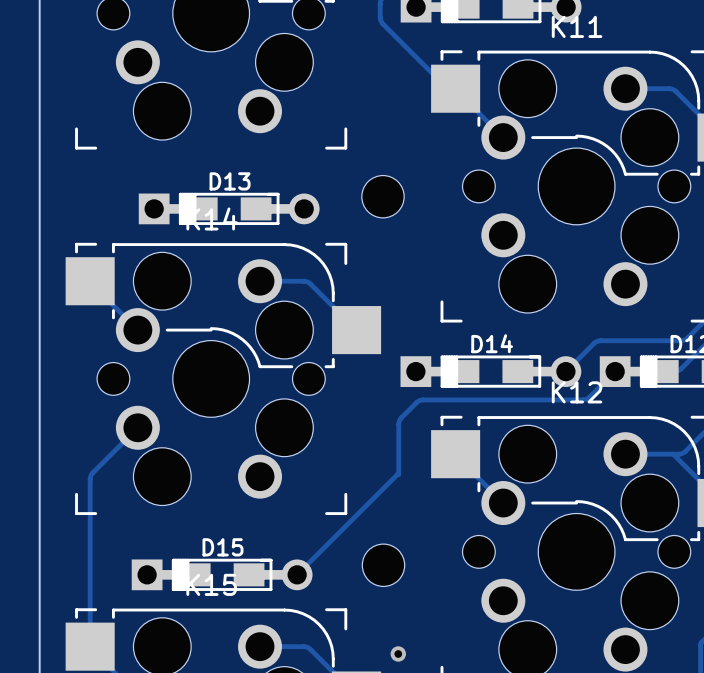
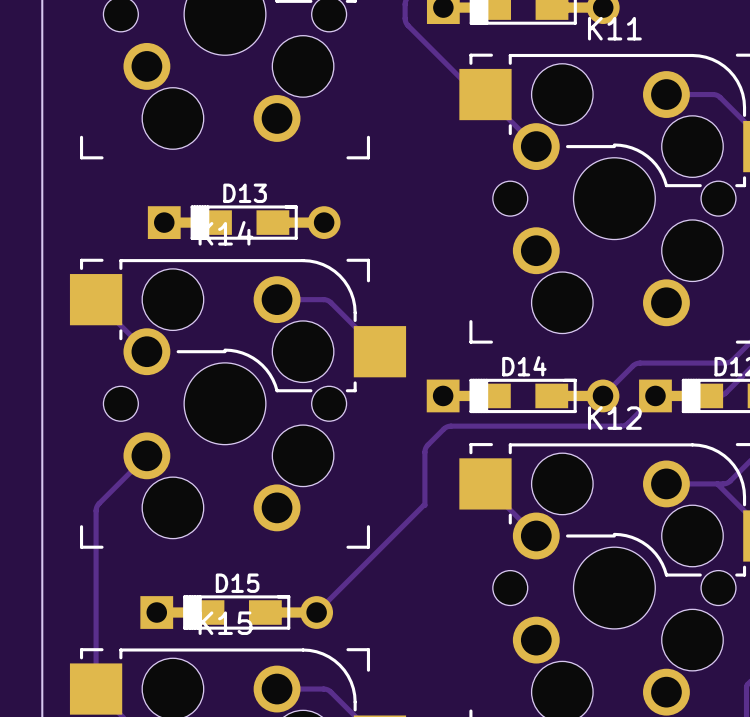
part: (382, 196) -> none
part: (383, 565) -> none
via: (398, 653) -> none

